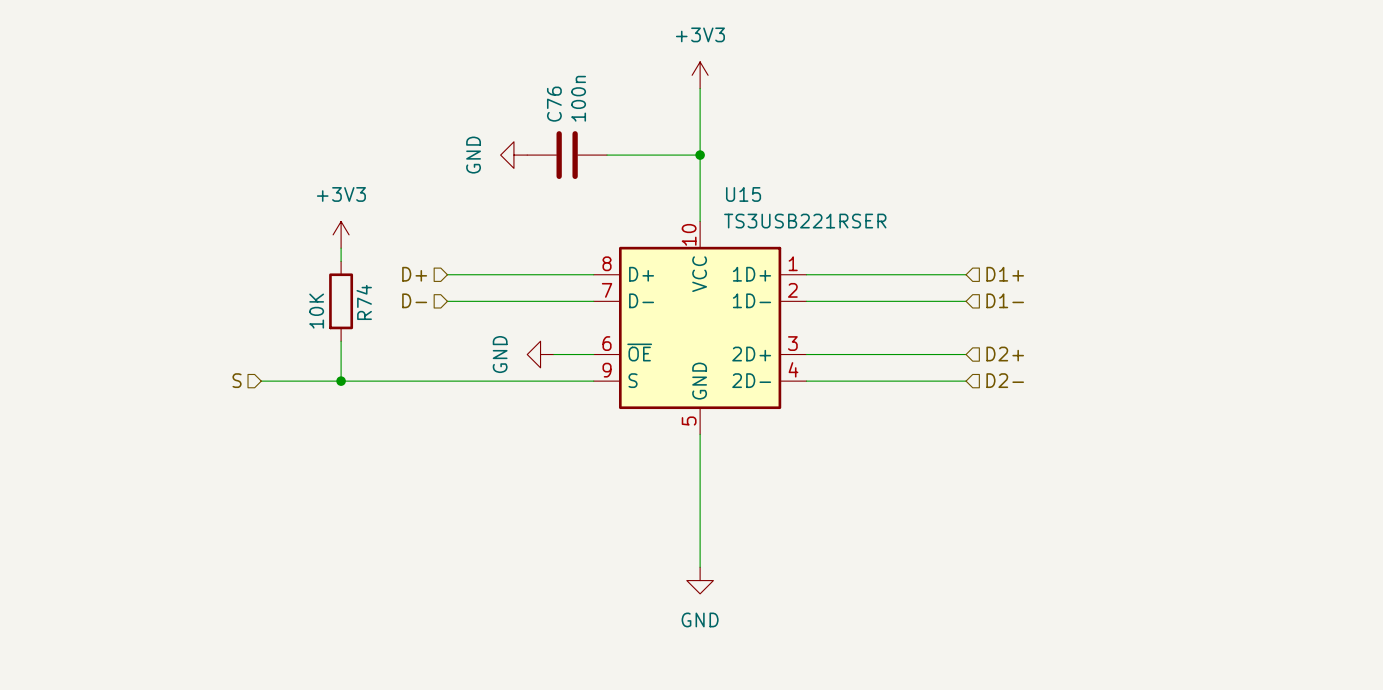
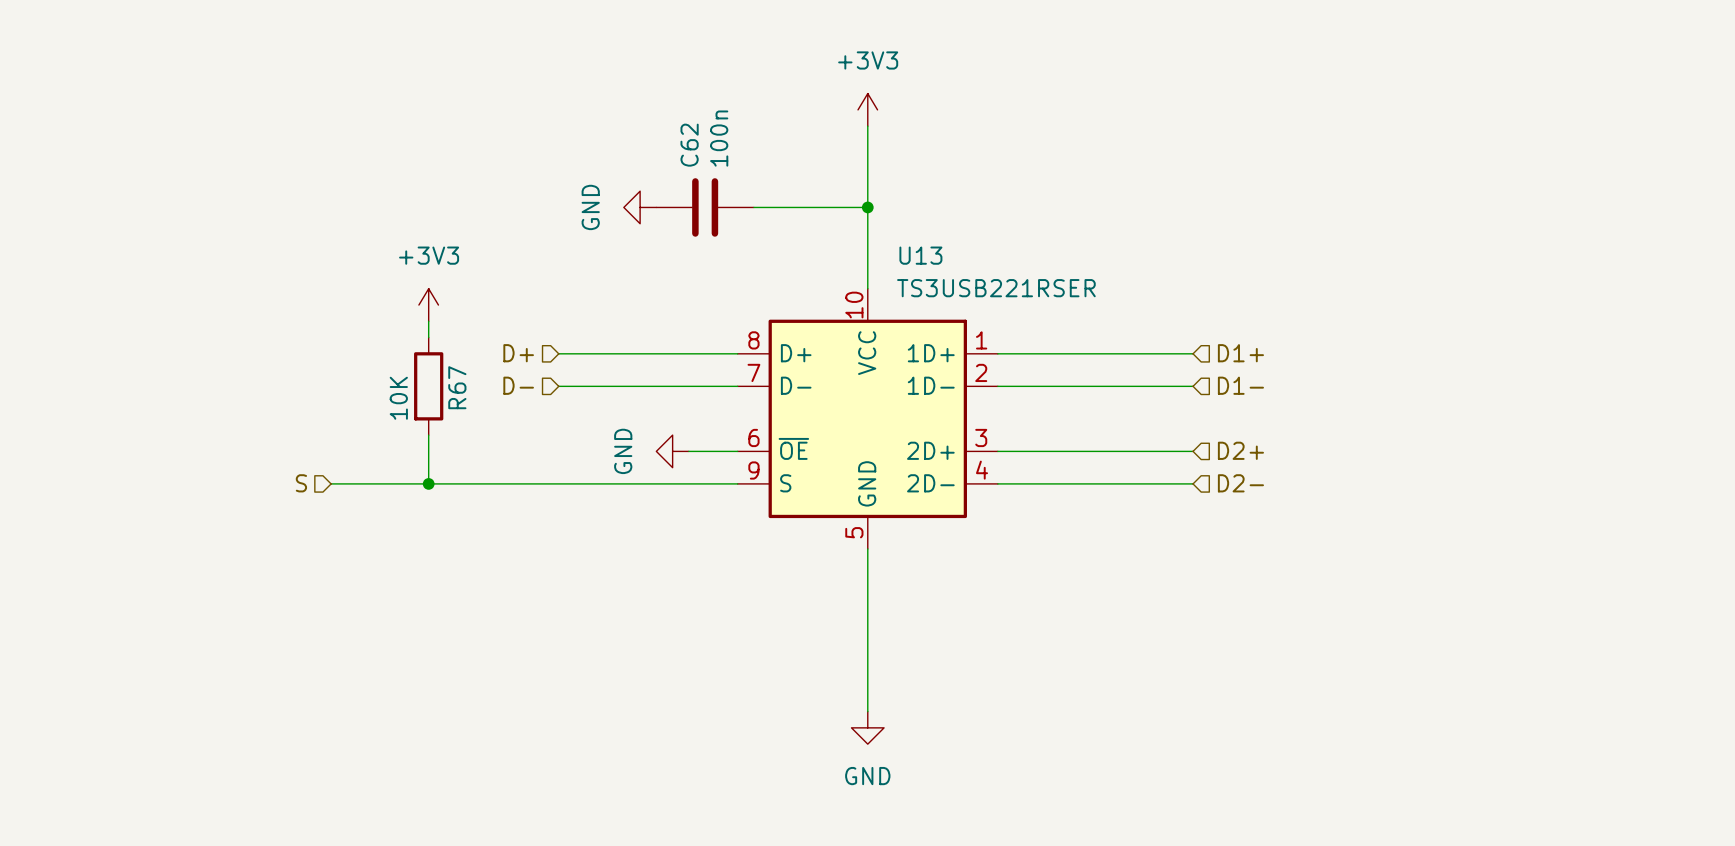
C76 name: C76 (554, 104) -> C62 (689, 145)
U15 name: U15 (743, 194) -> U13 (920, 255)
R74 name: R74 (364, 302) -> R67 (457, 387)

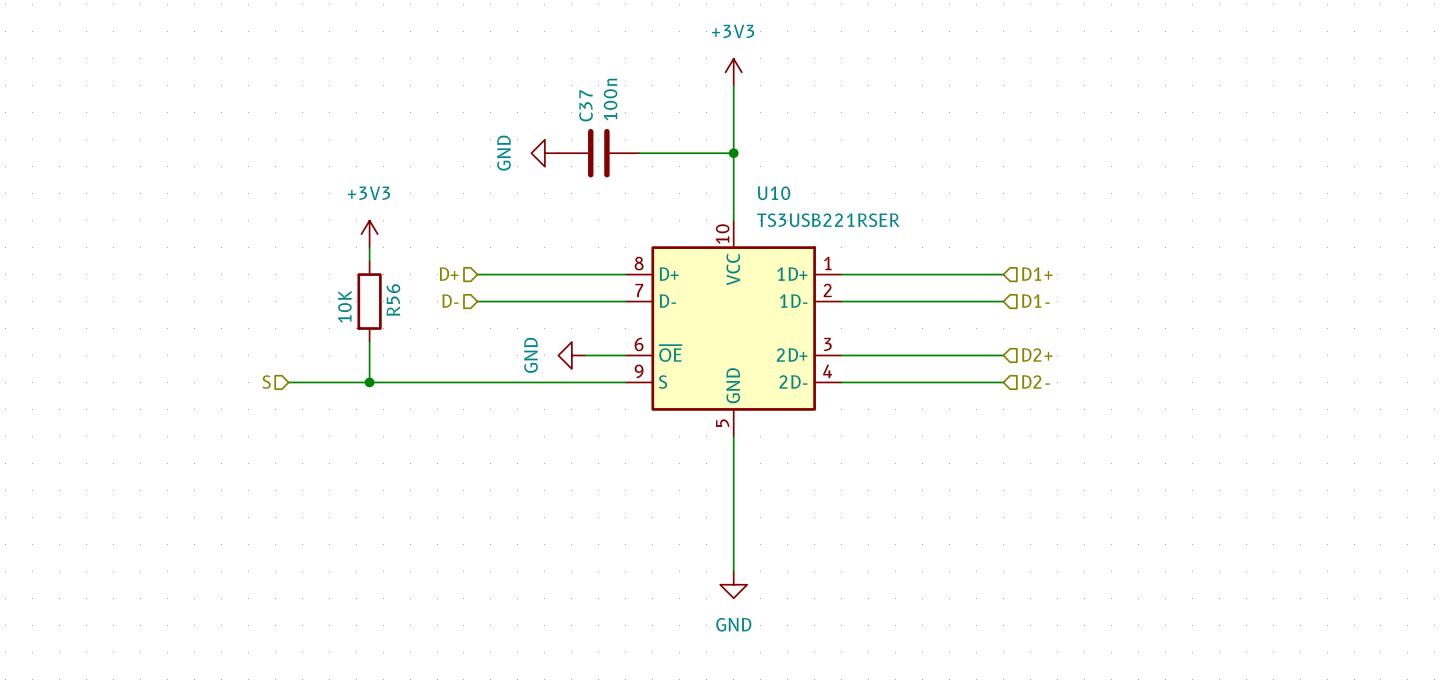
C62 name: C62 (689, 145) -> C37 (586, 105)
U13 name: U13 (920, 255) -> U10 (774, 193)
R67 name: R67 (457, 387) -> R56 (393, 300)

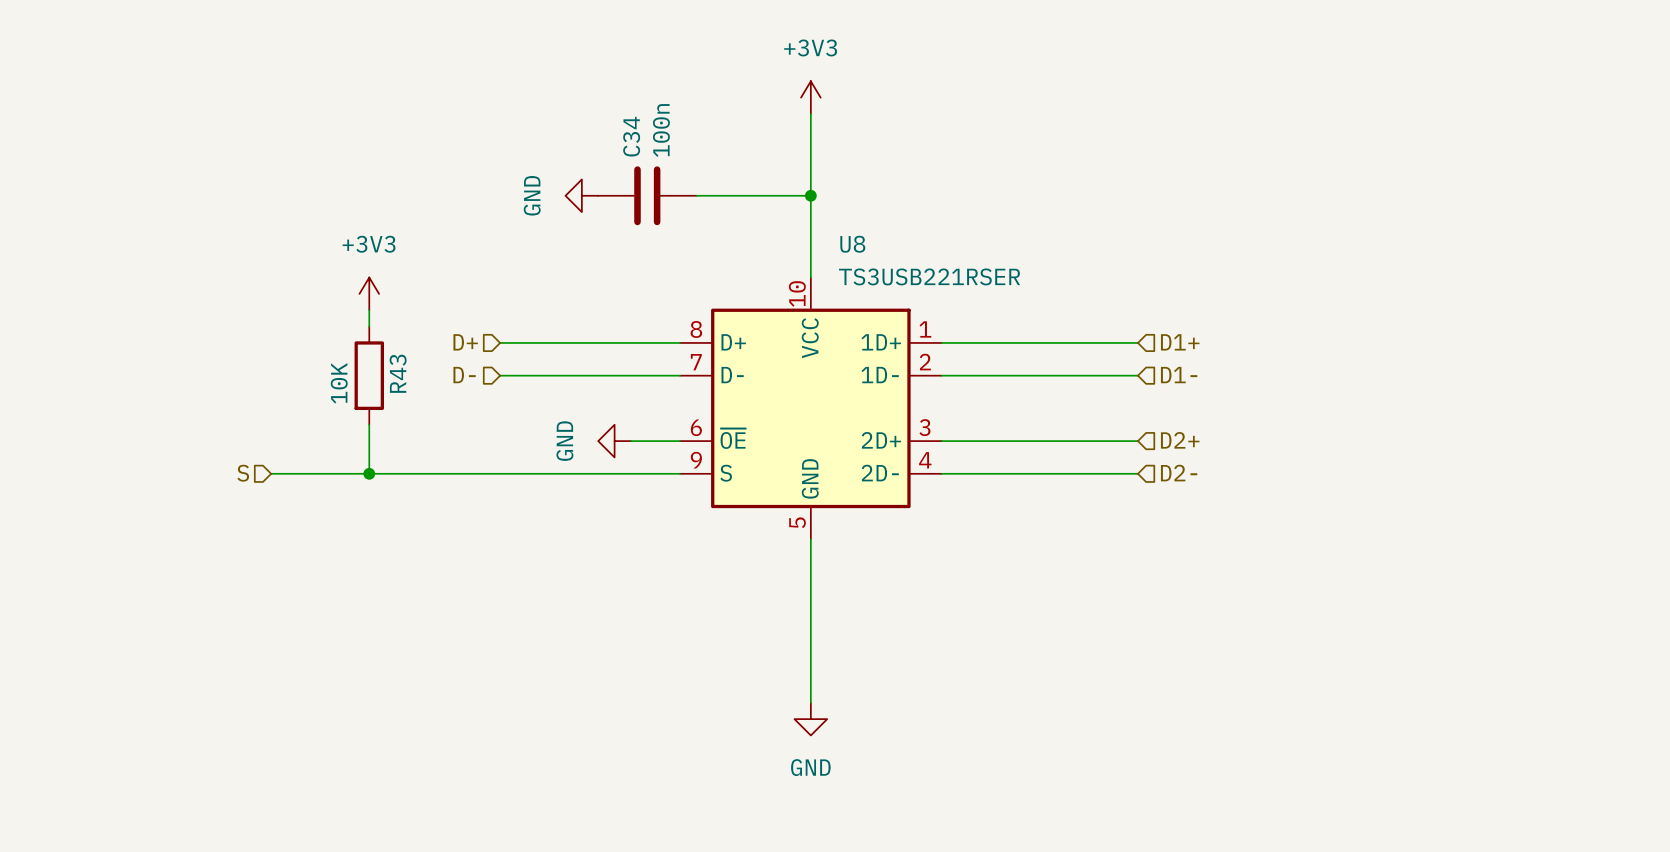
C37 name: C37 (586, 105) -> C34 (631, 136)
U10 name: U10 (774, 193) -> U8 (852, 244)
R56 name: R56 (393, 300) -> R43 (398, 373)

